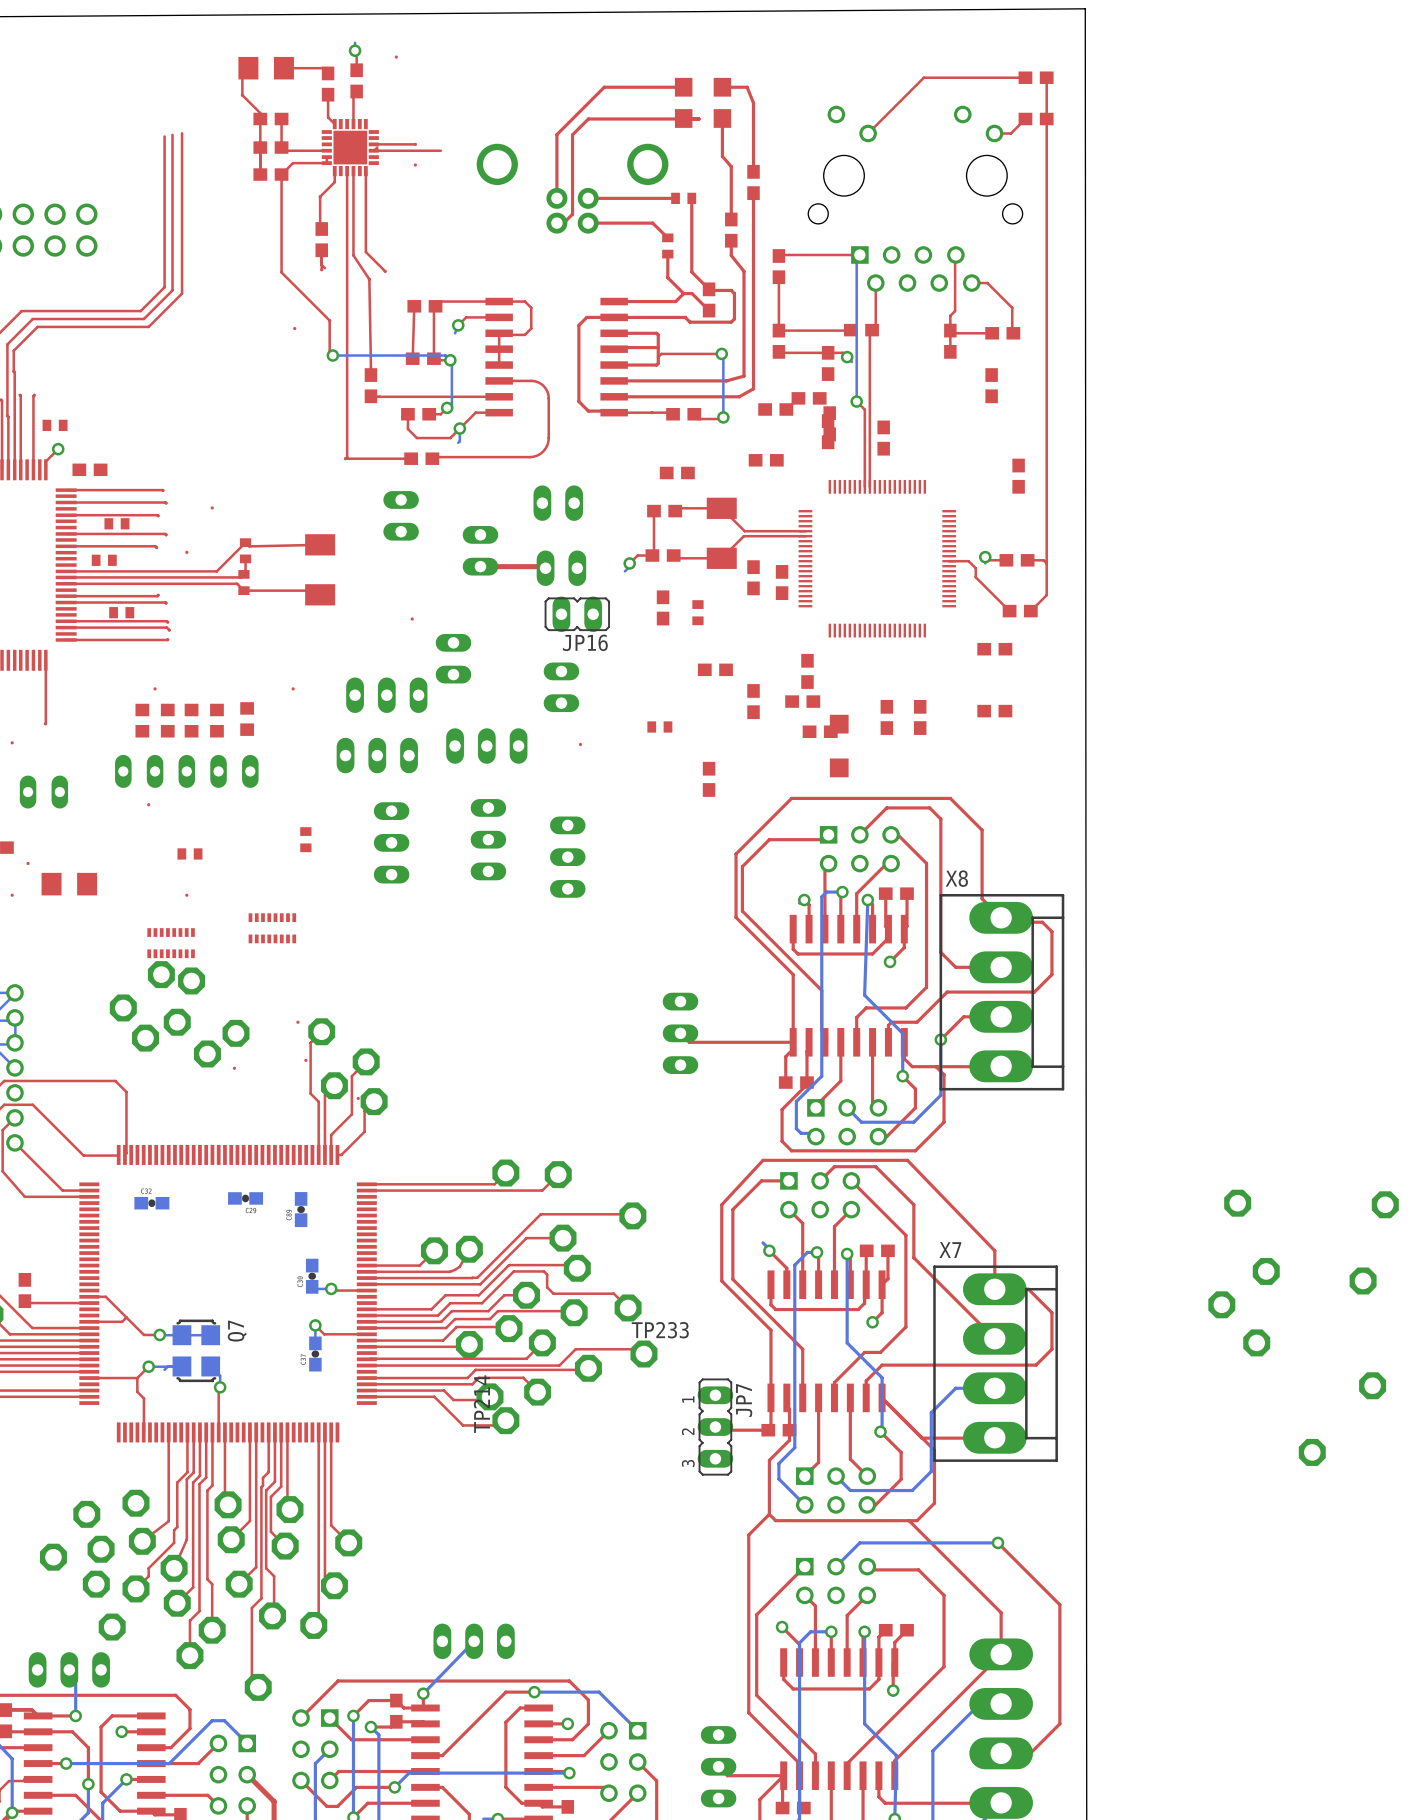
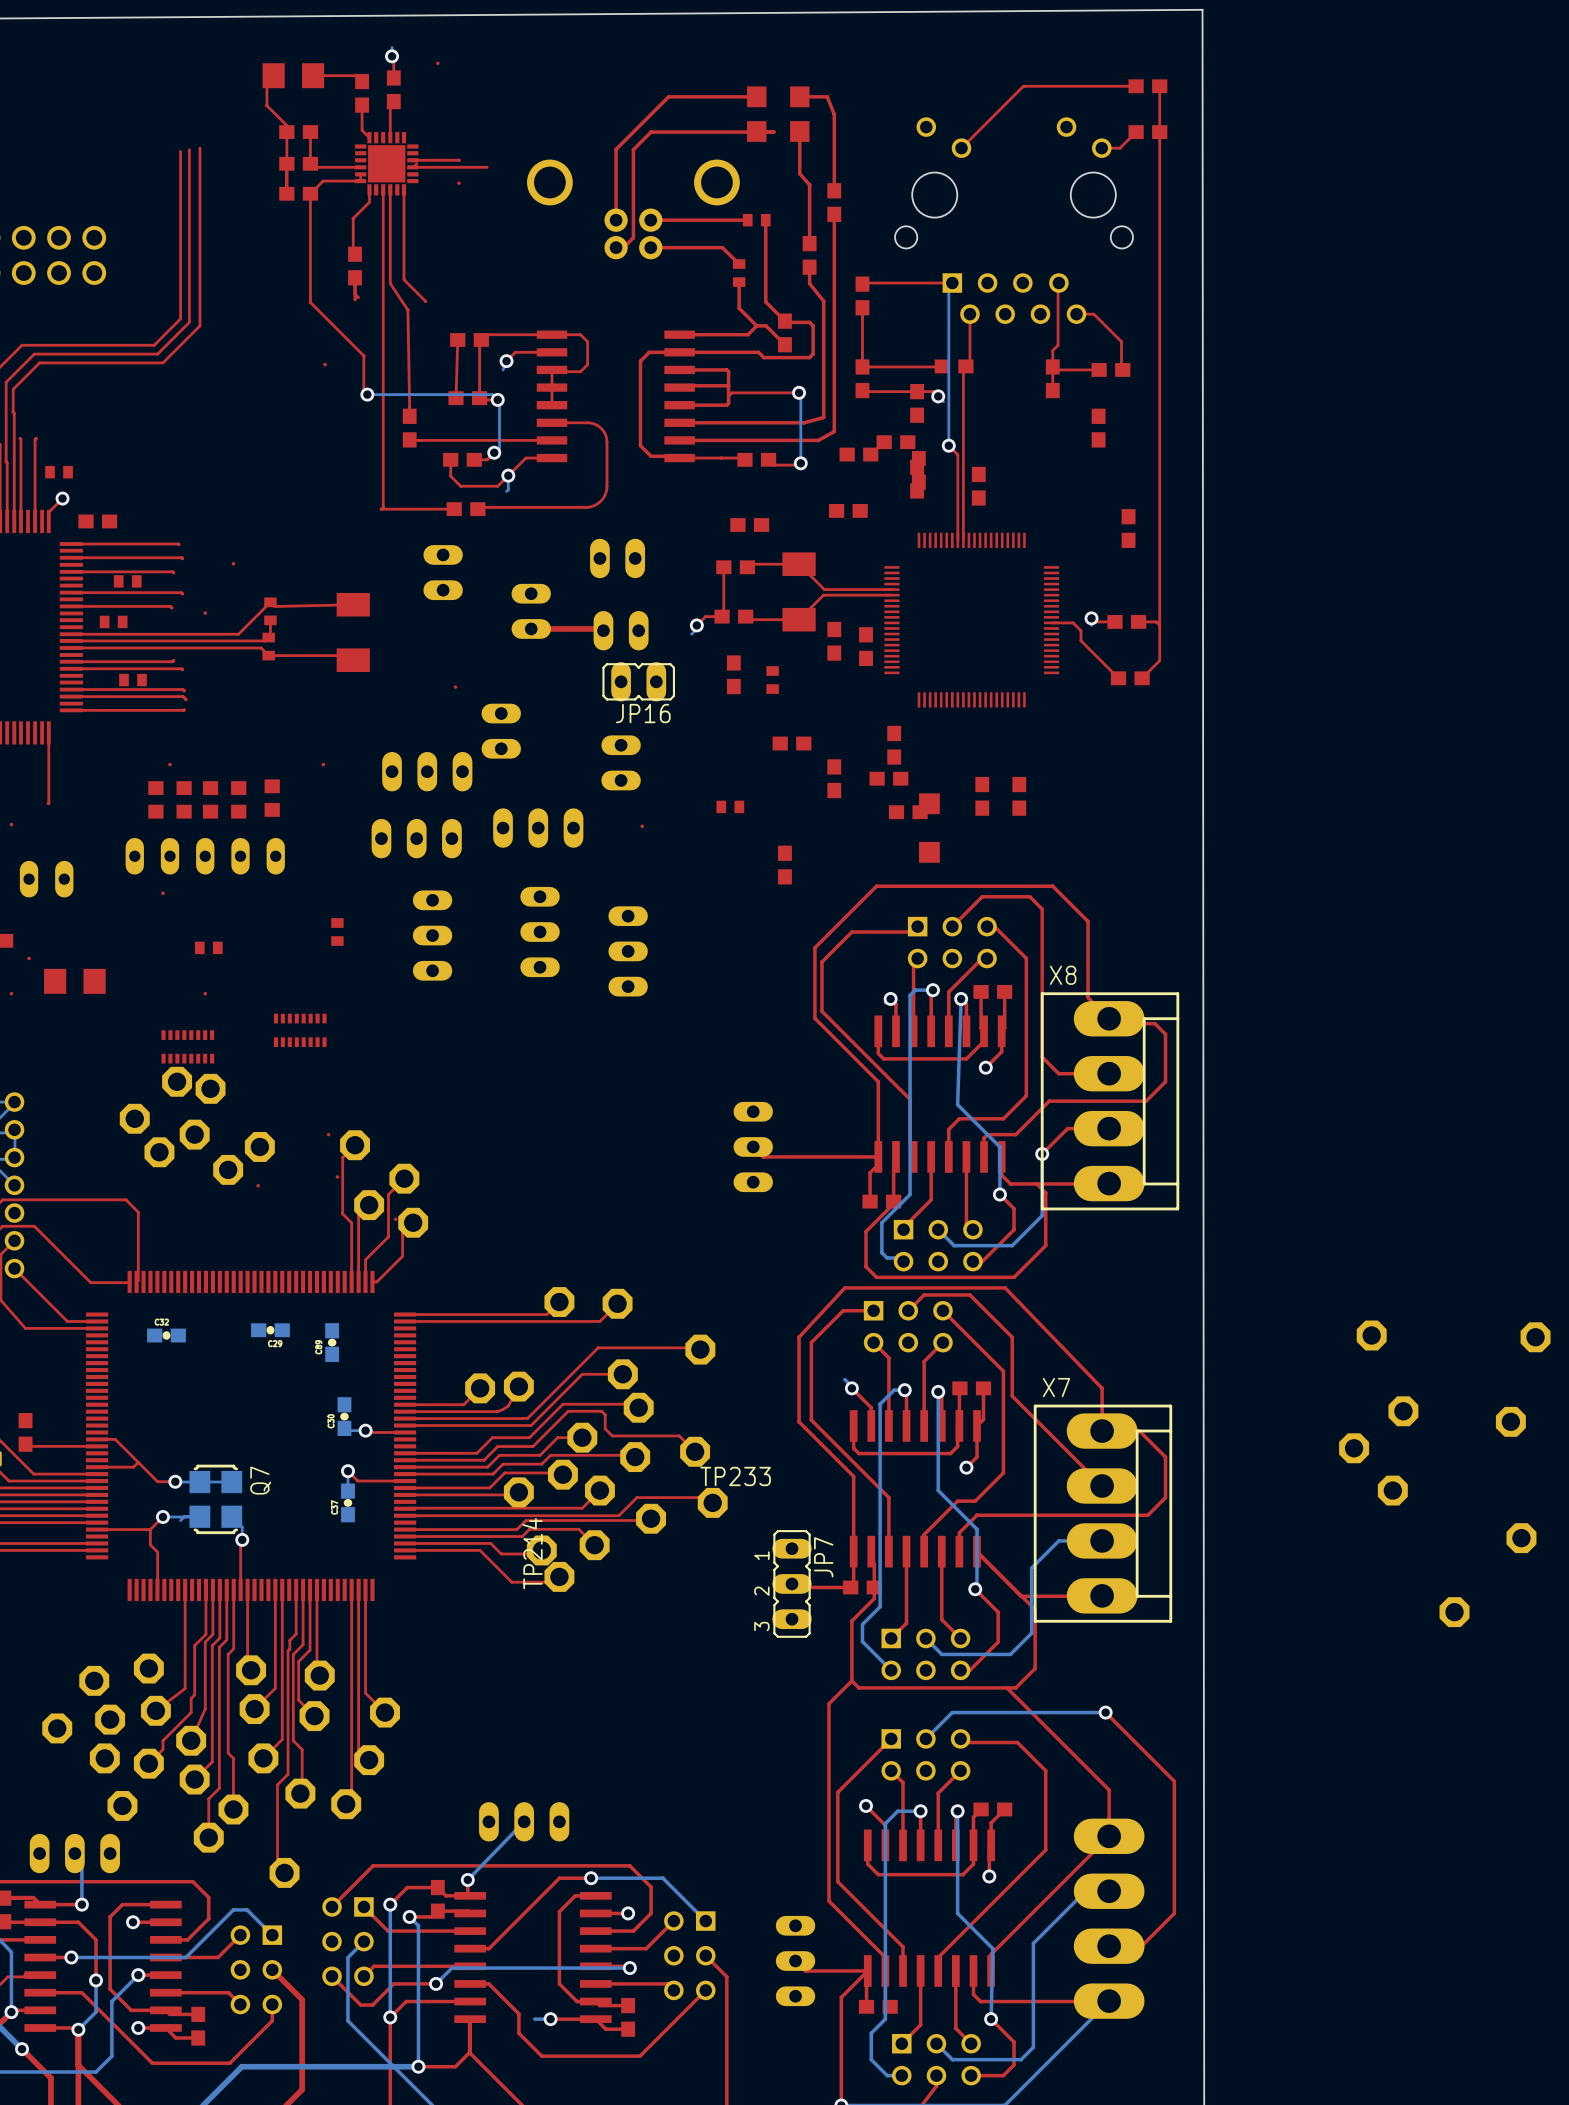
part: (994, 649) -> none
part: (994, 711) -> none

